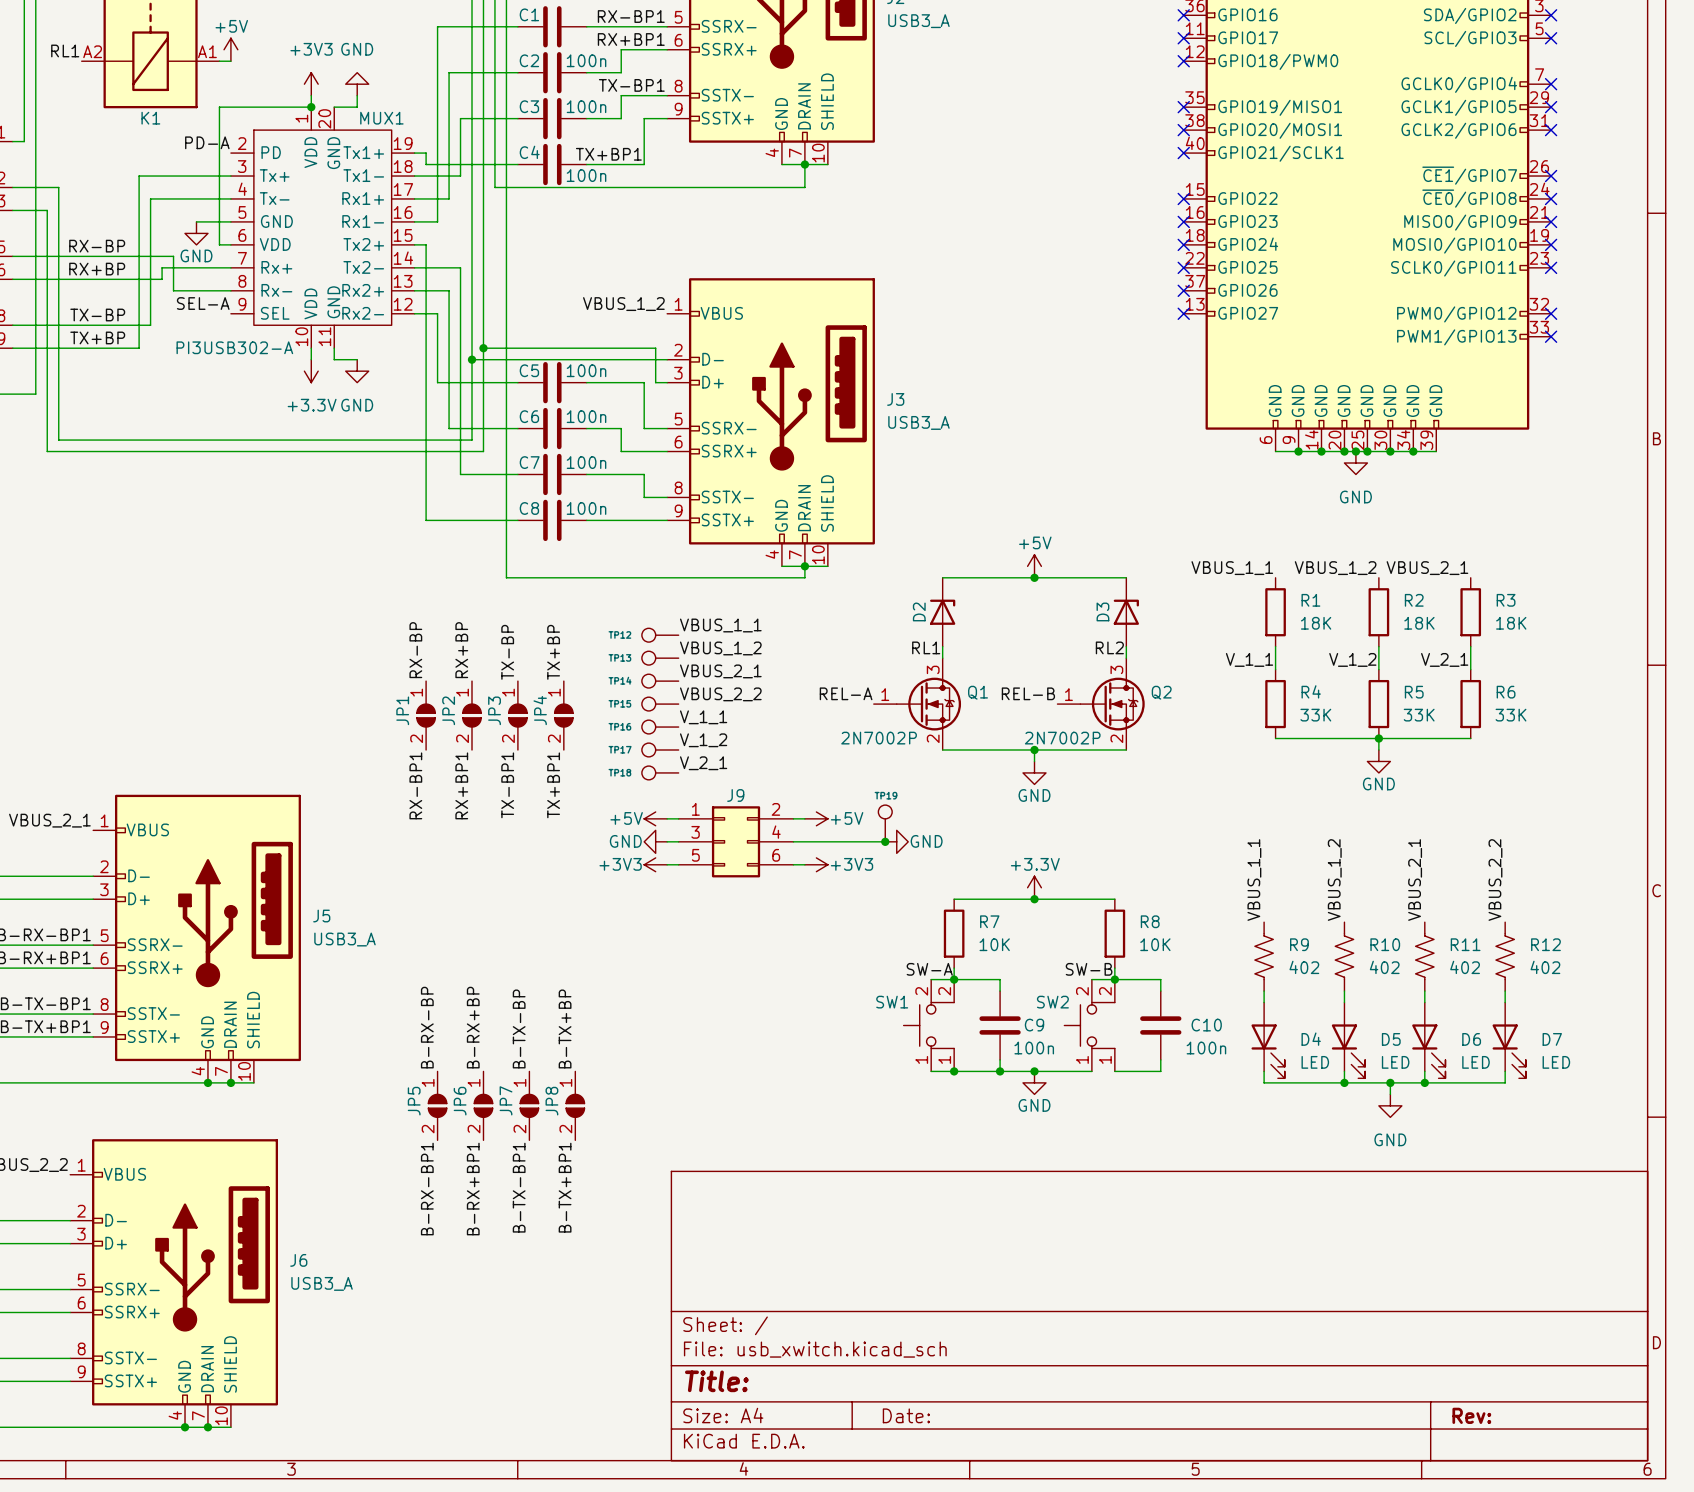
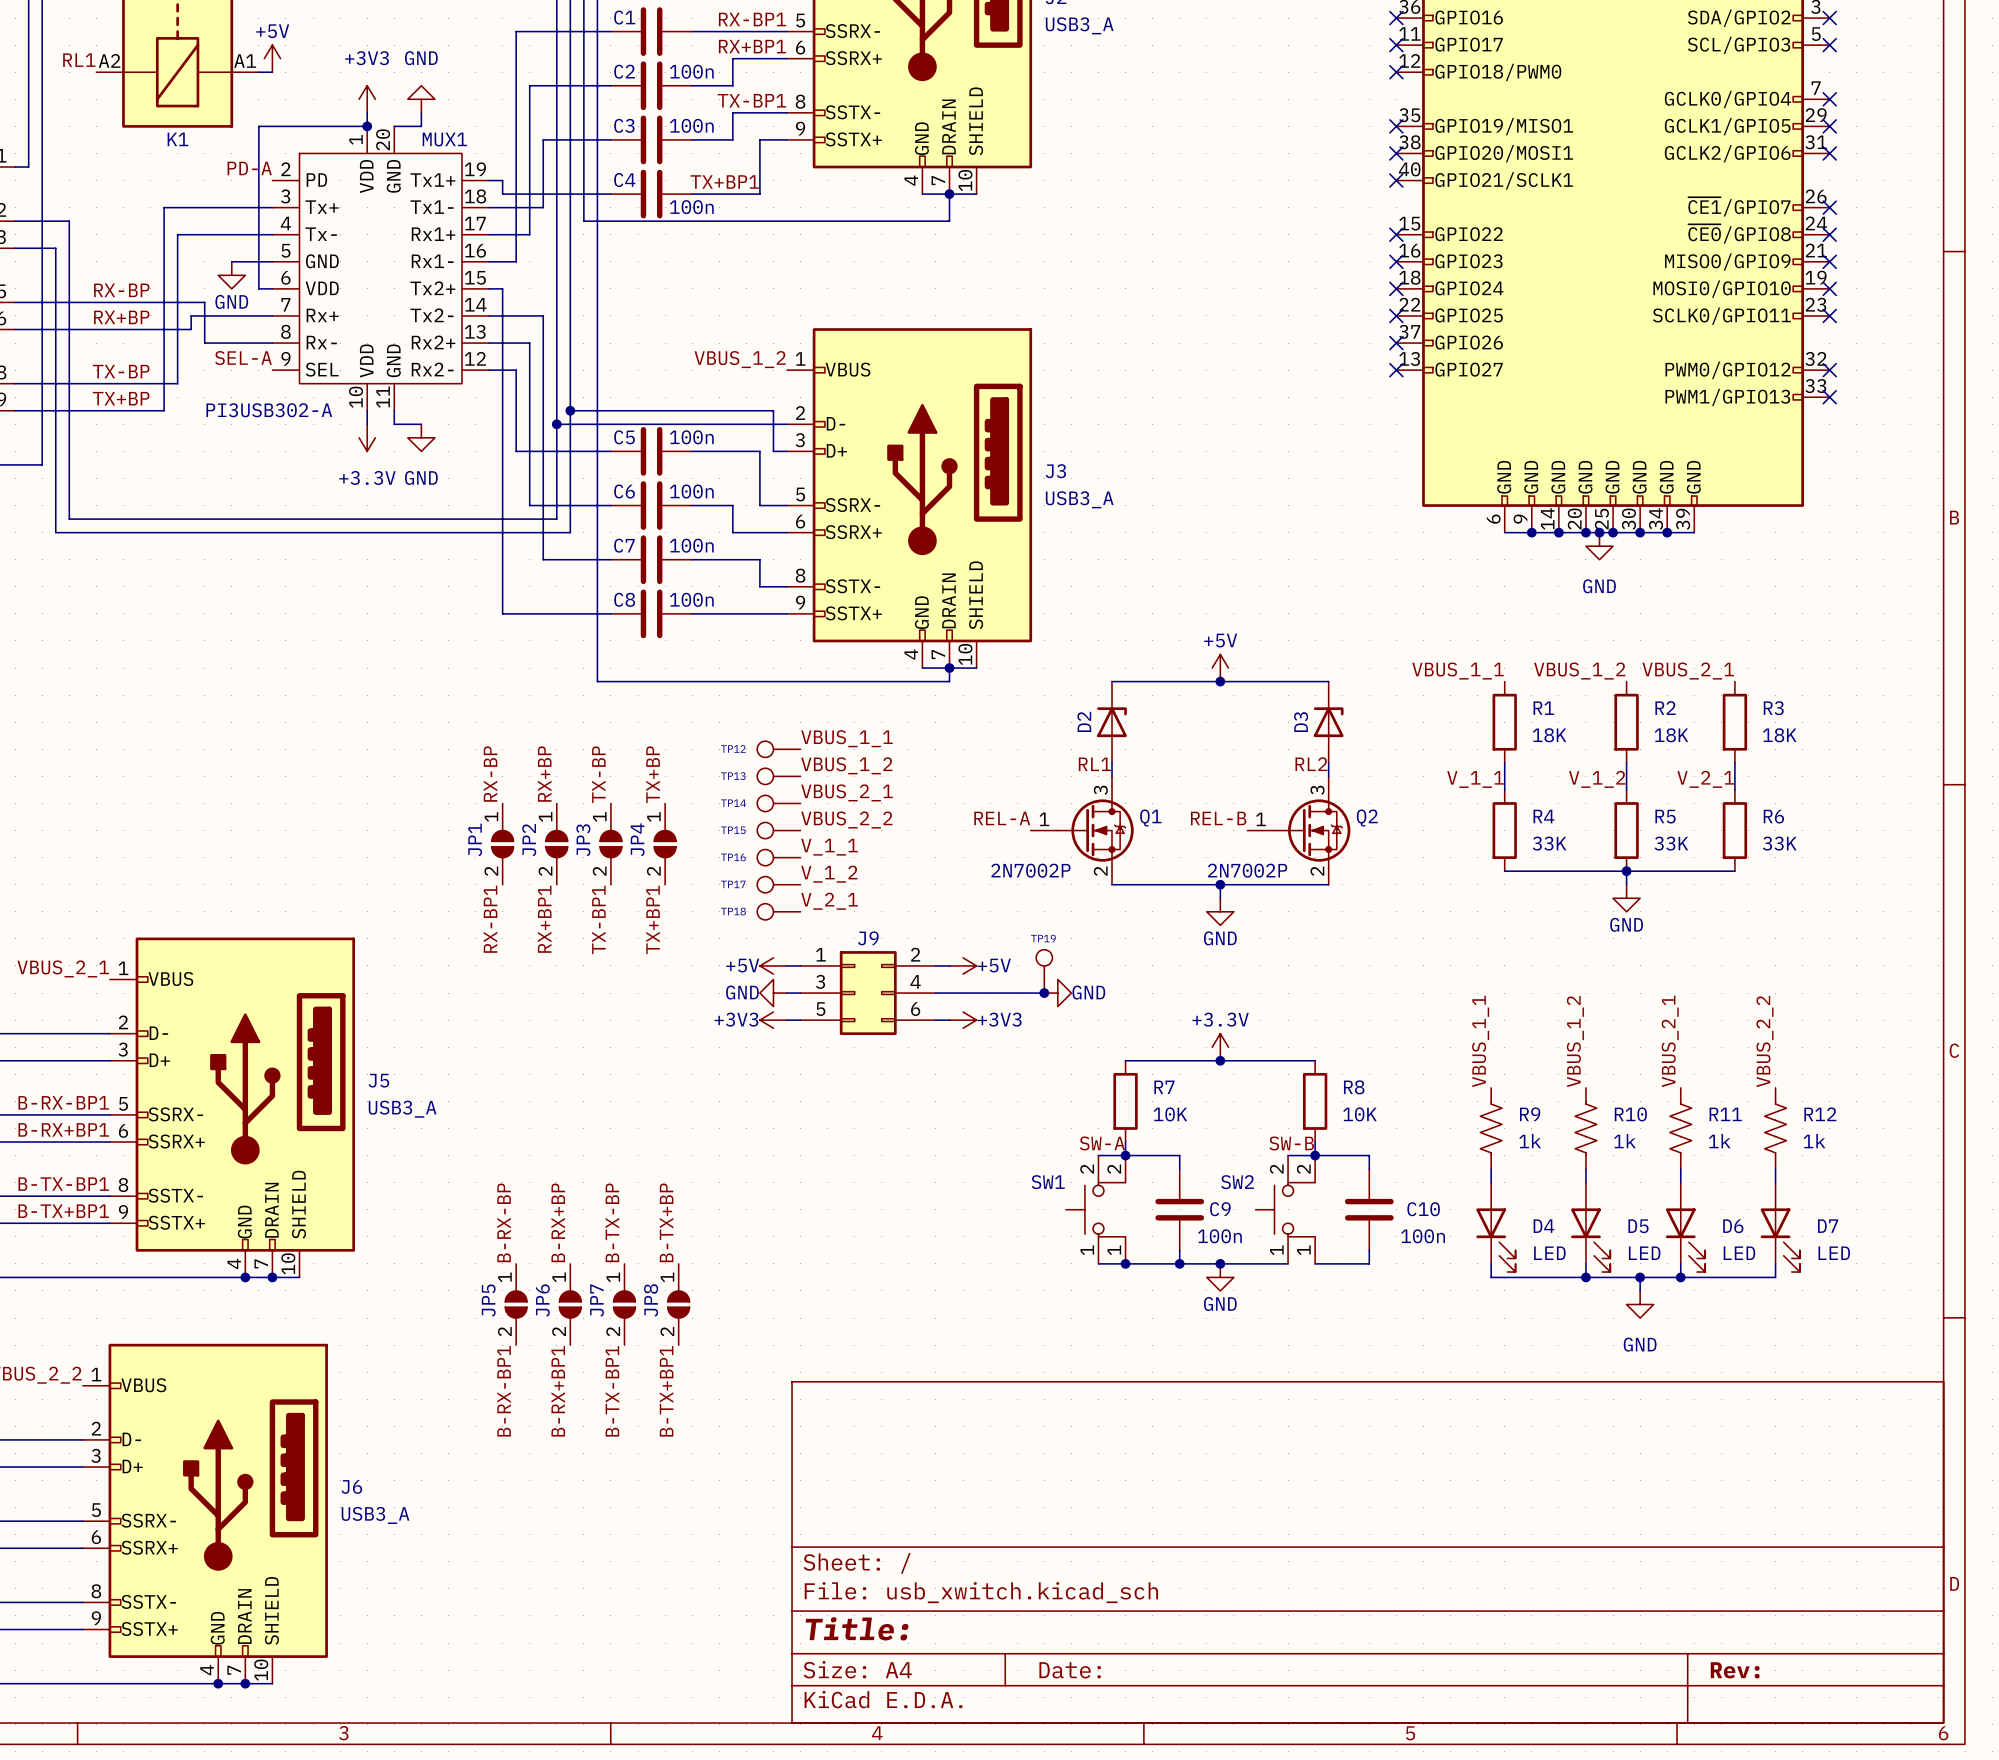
R9 value: 402 (1304, 967) -> 1k (1530, 1141)
R10 value: 402 (1384, 967) -> 1k (1624, 1141)
R11 value: 402 (1465, 967) -> 1k (1719, 1141)
R12 value: 402 (1545, 967) -> 1k (1814, 1141)

